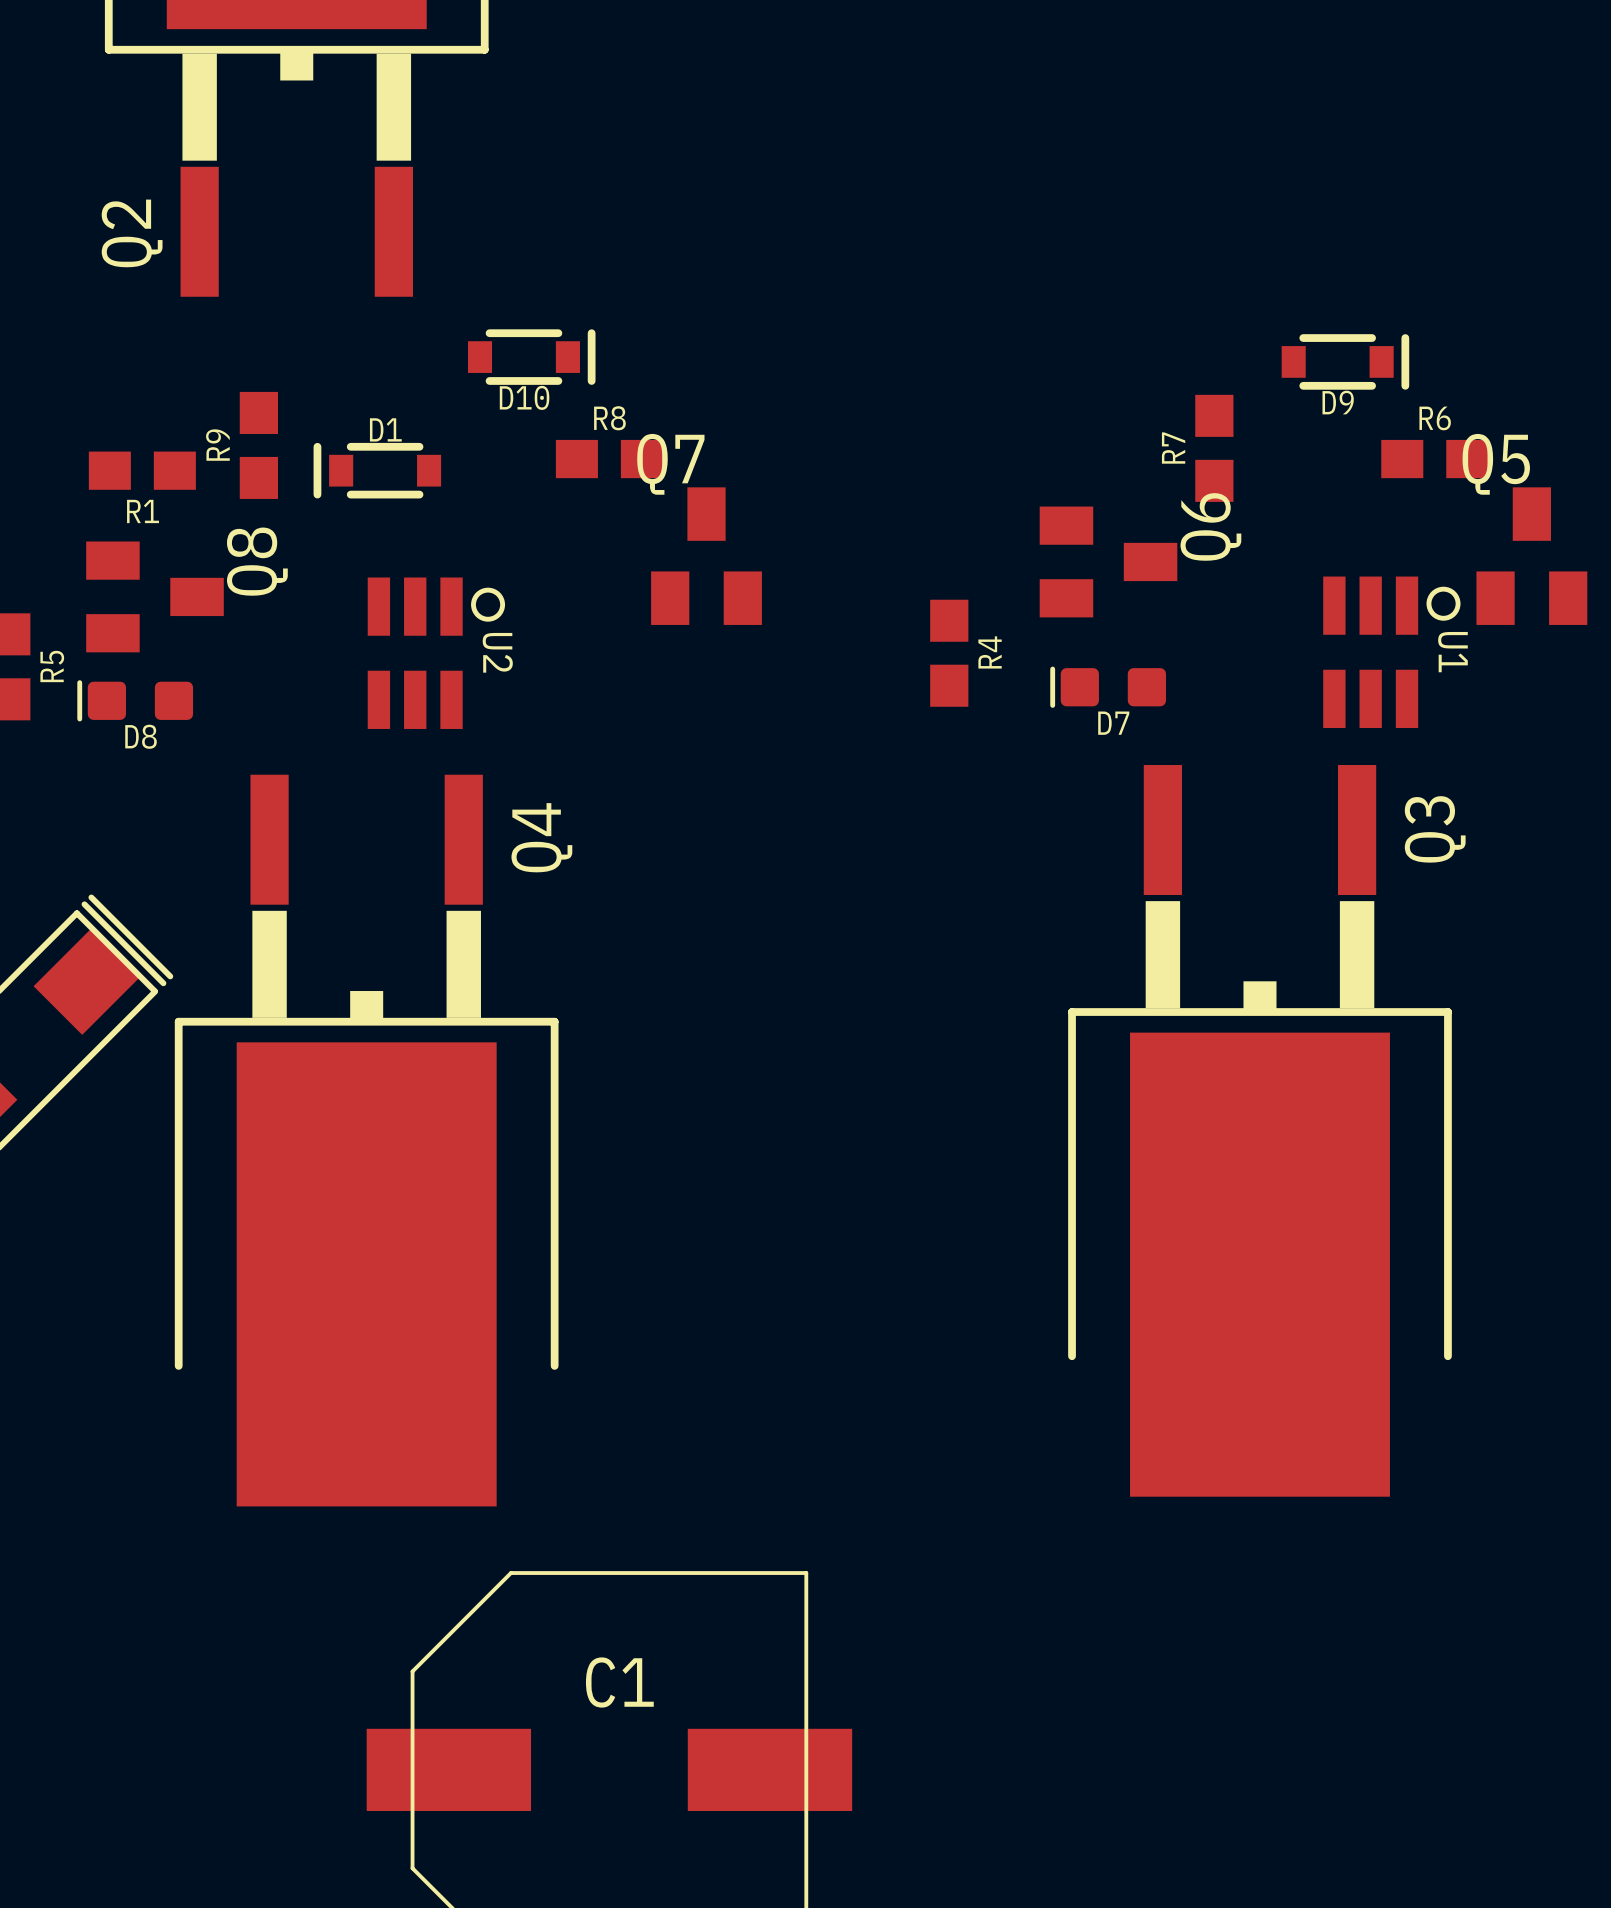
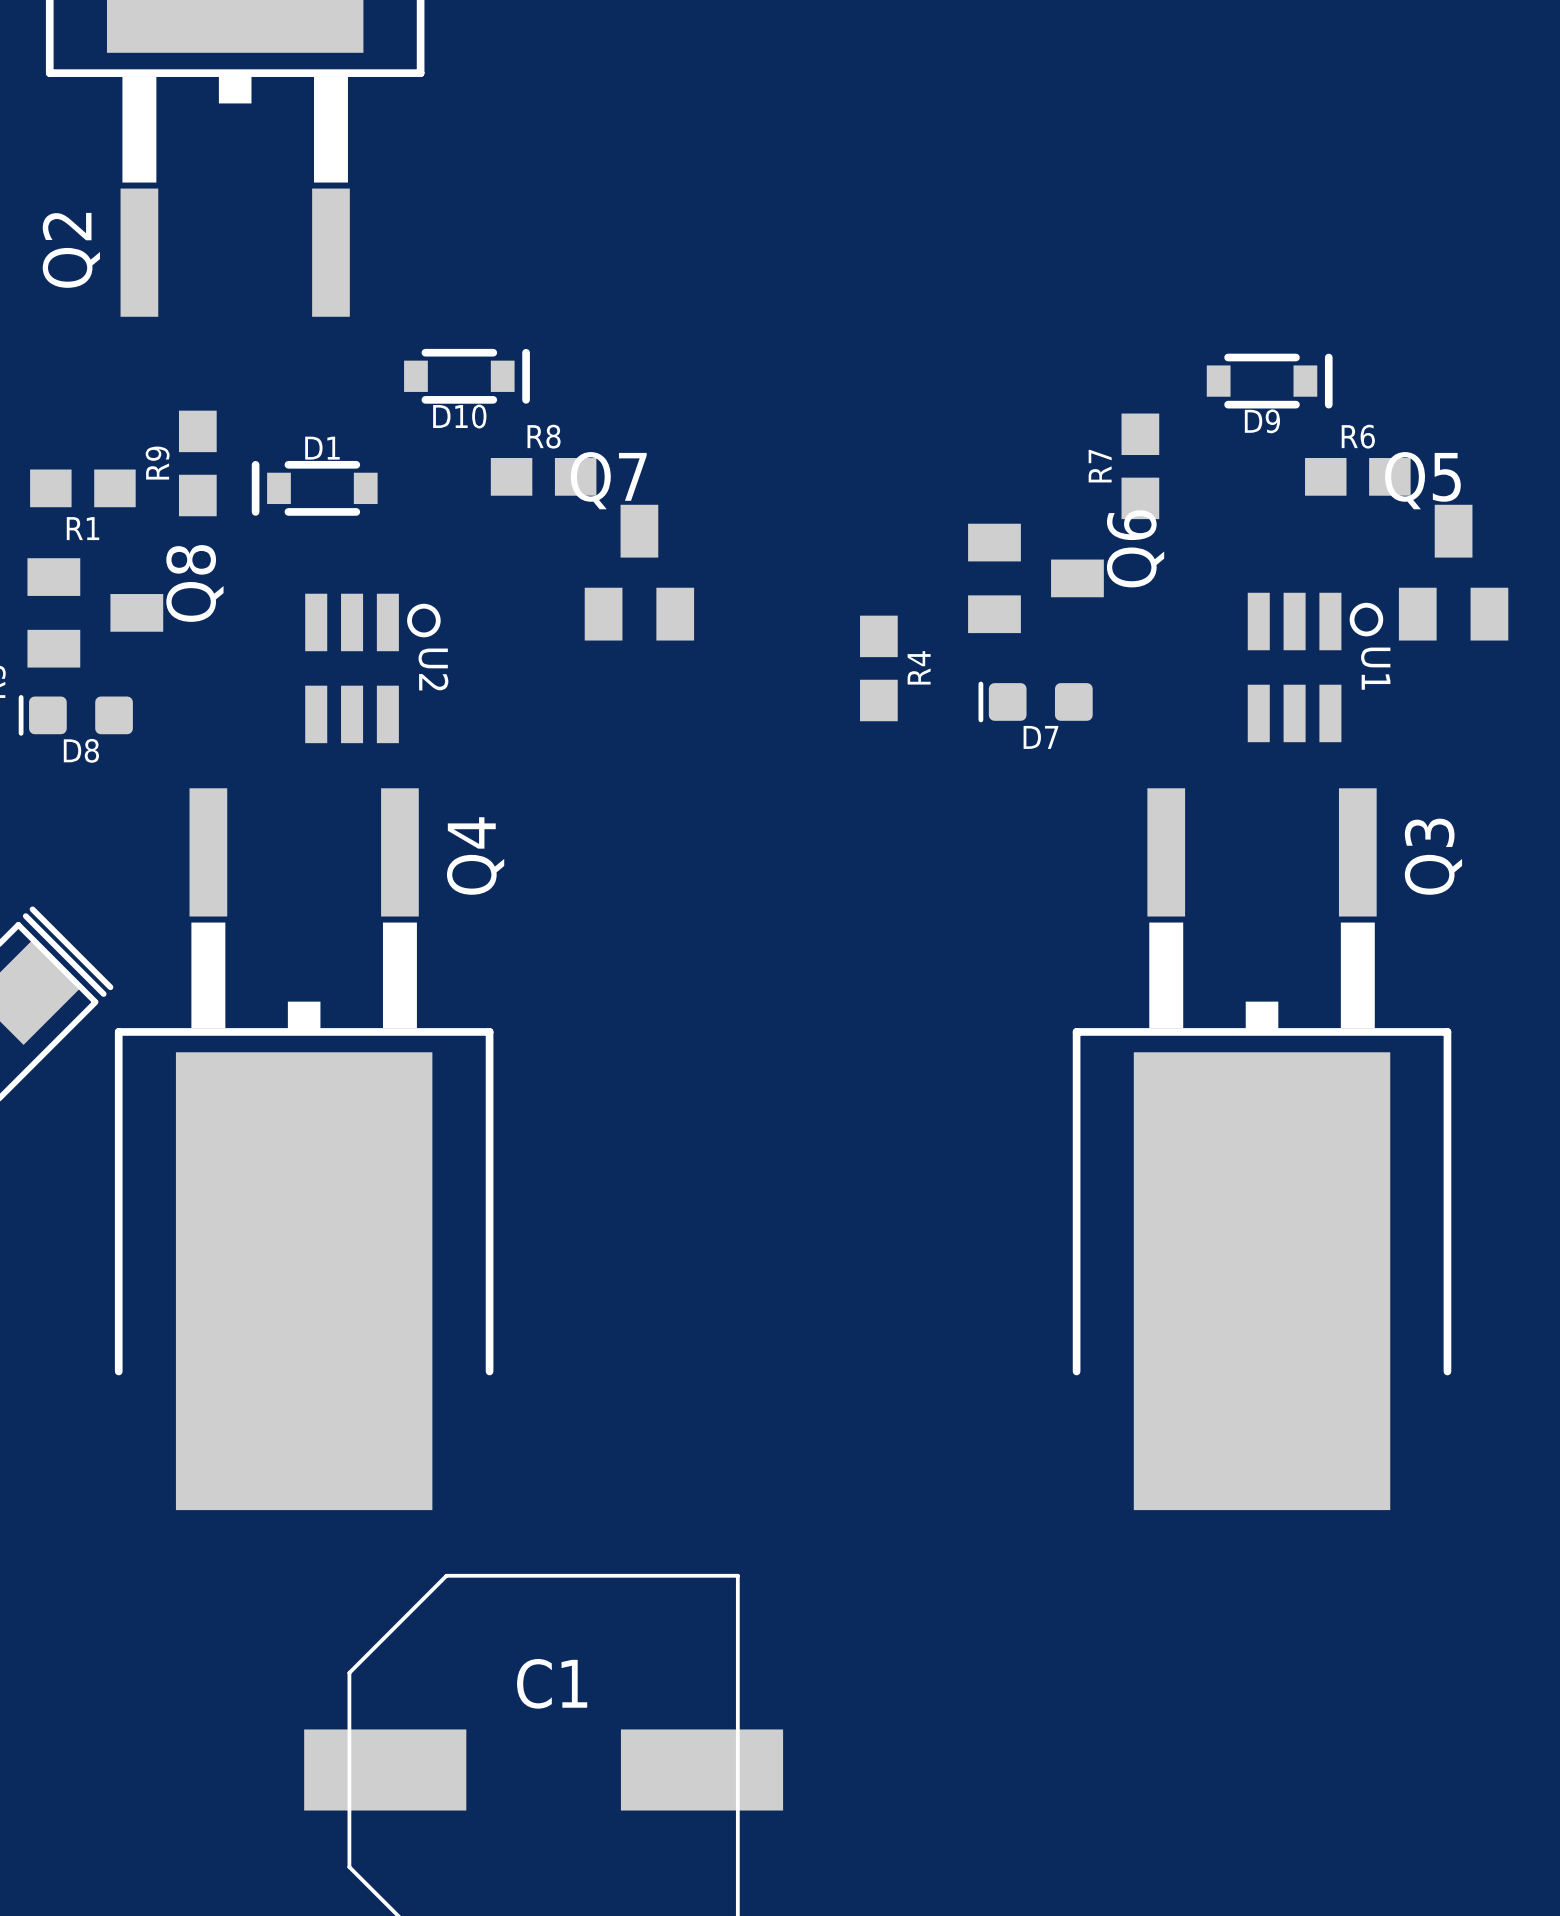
Q3 position: (1259, 1130) -> (1262, 1149)

